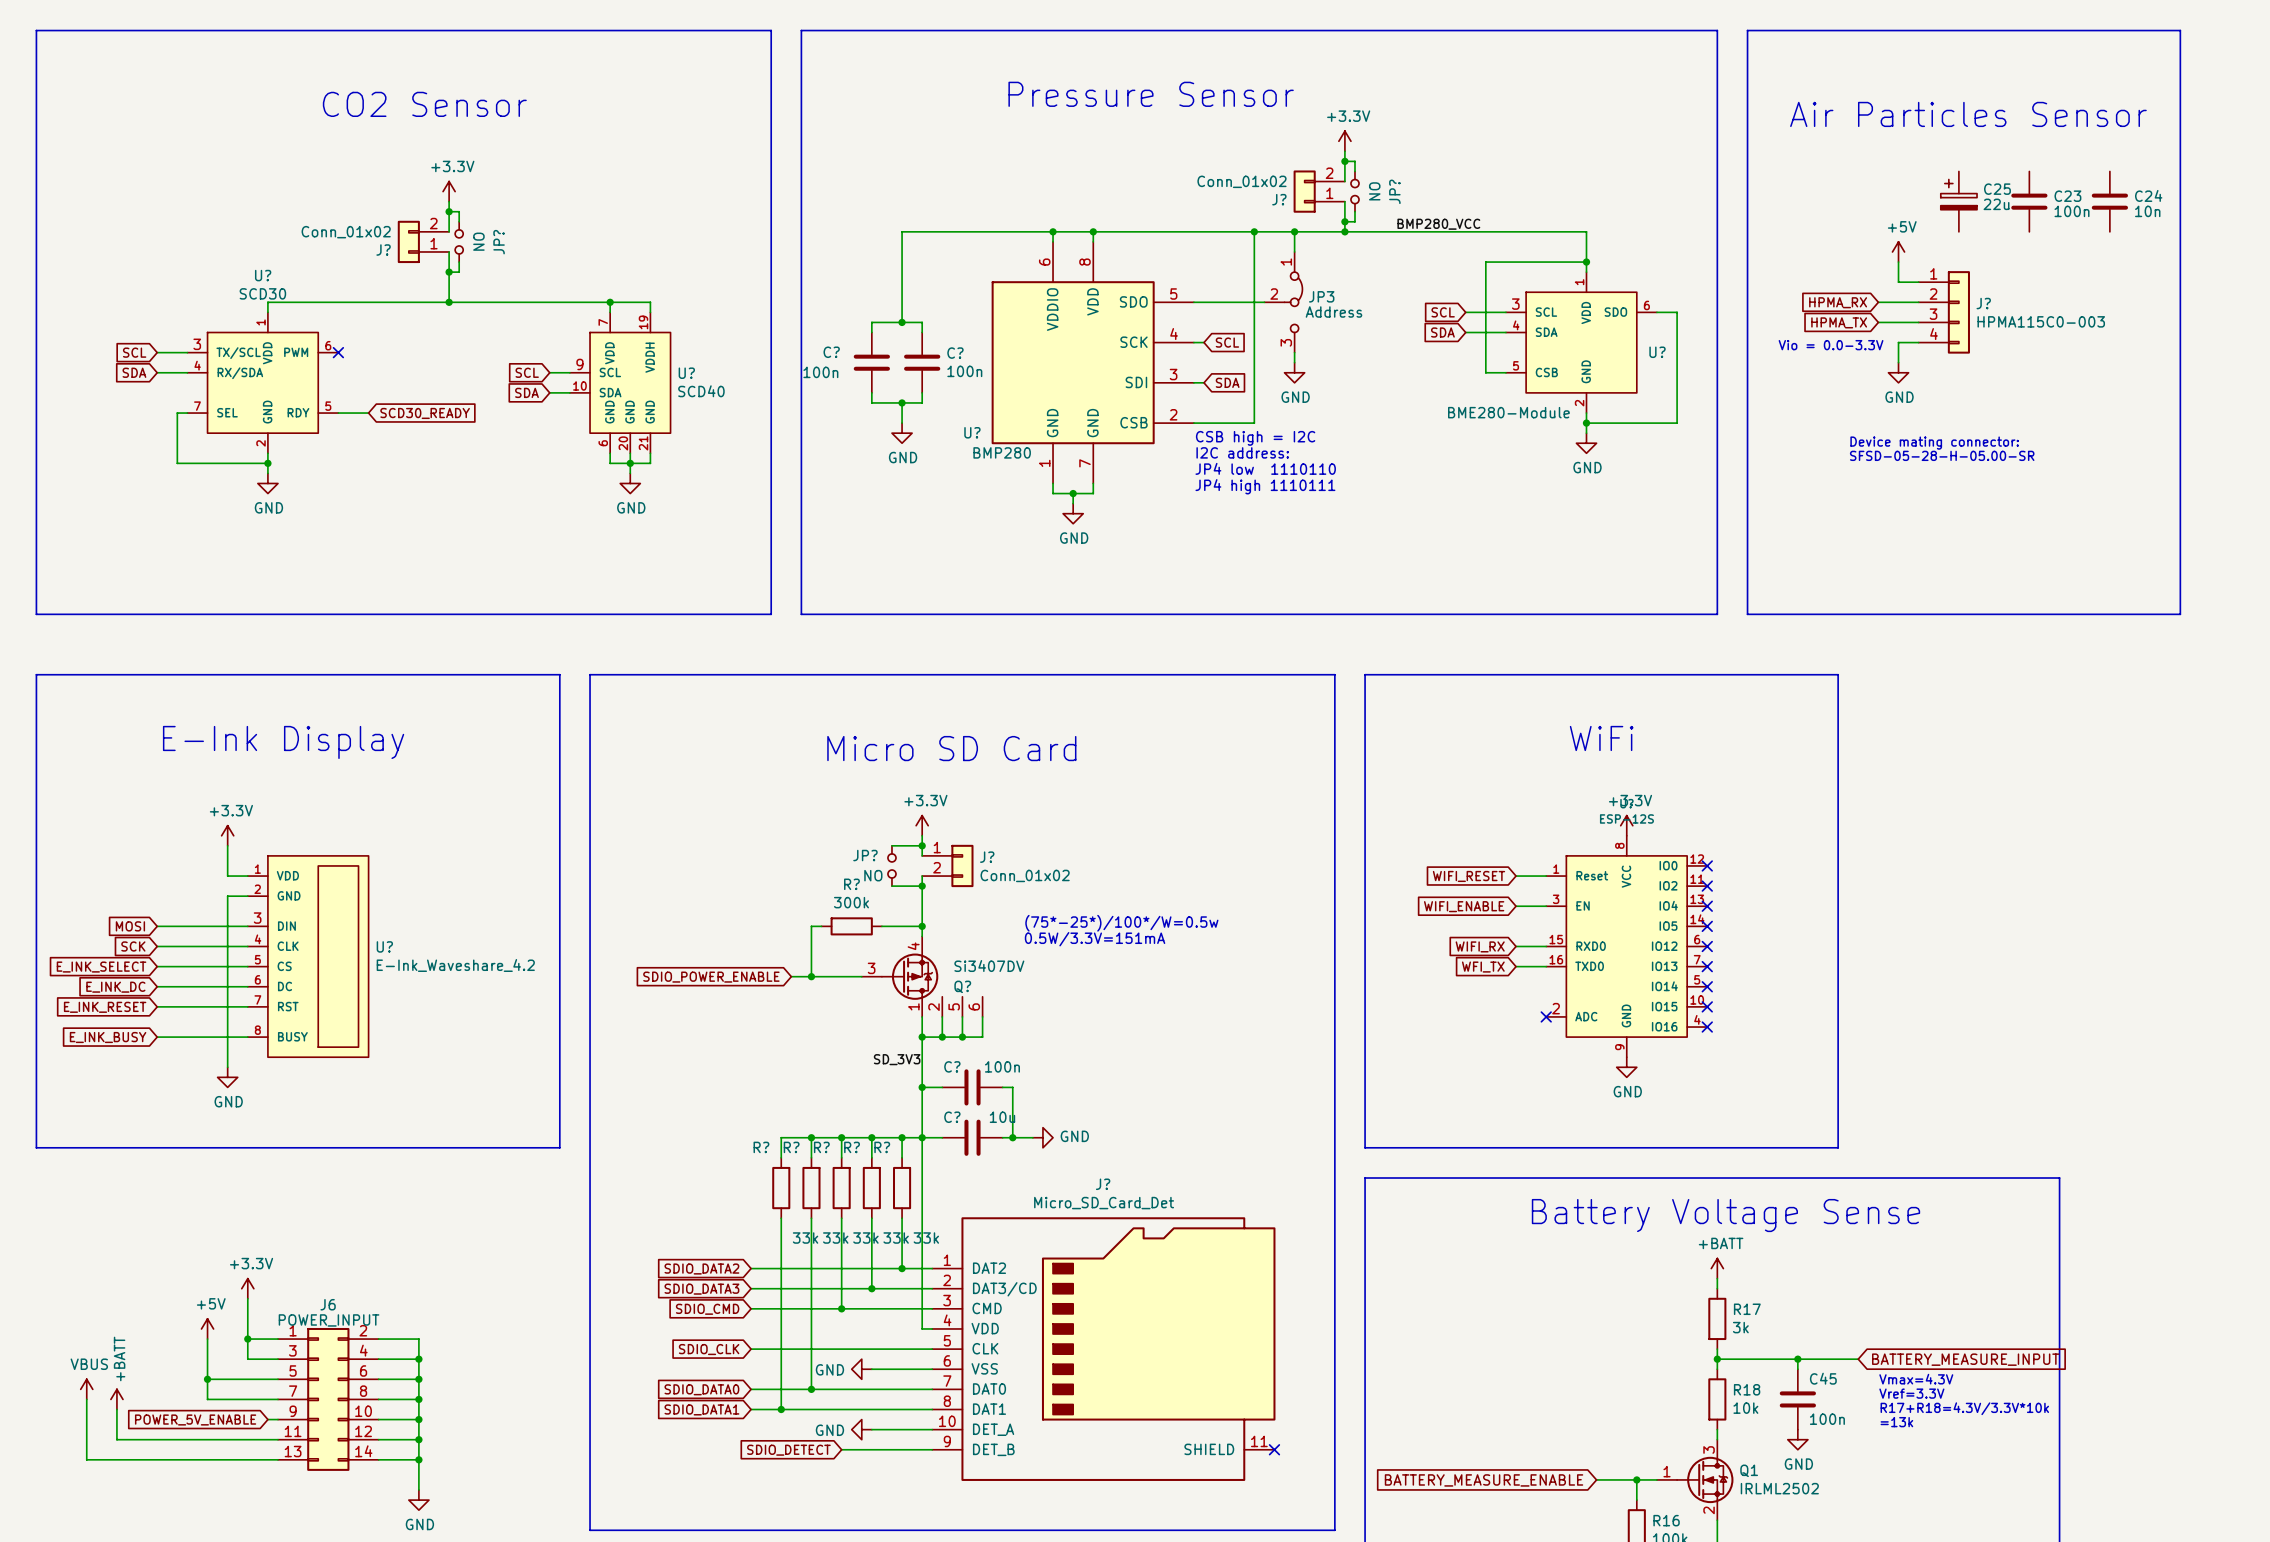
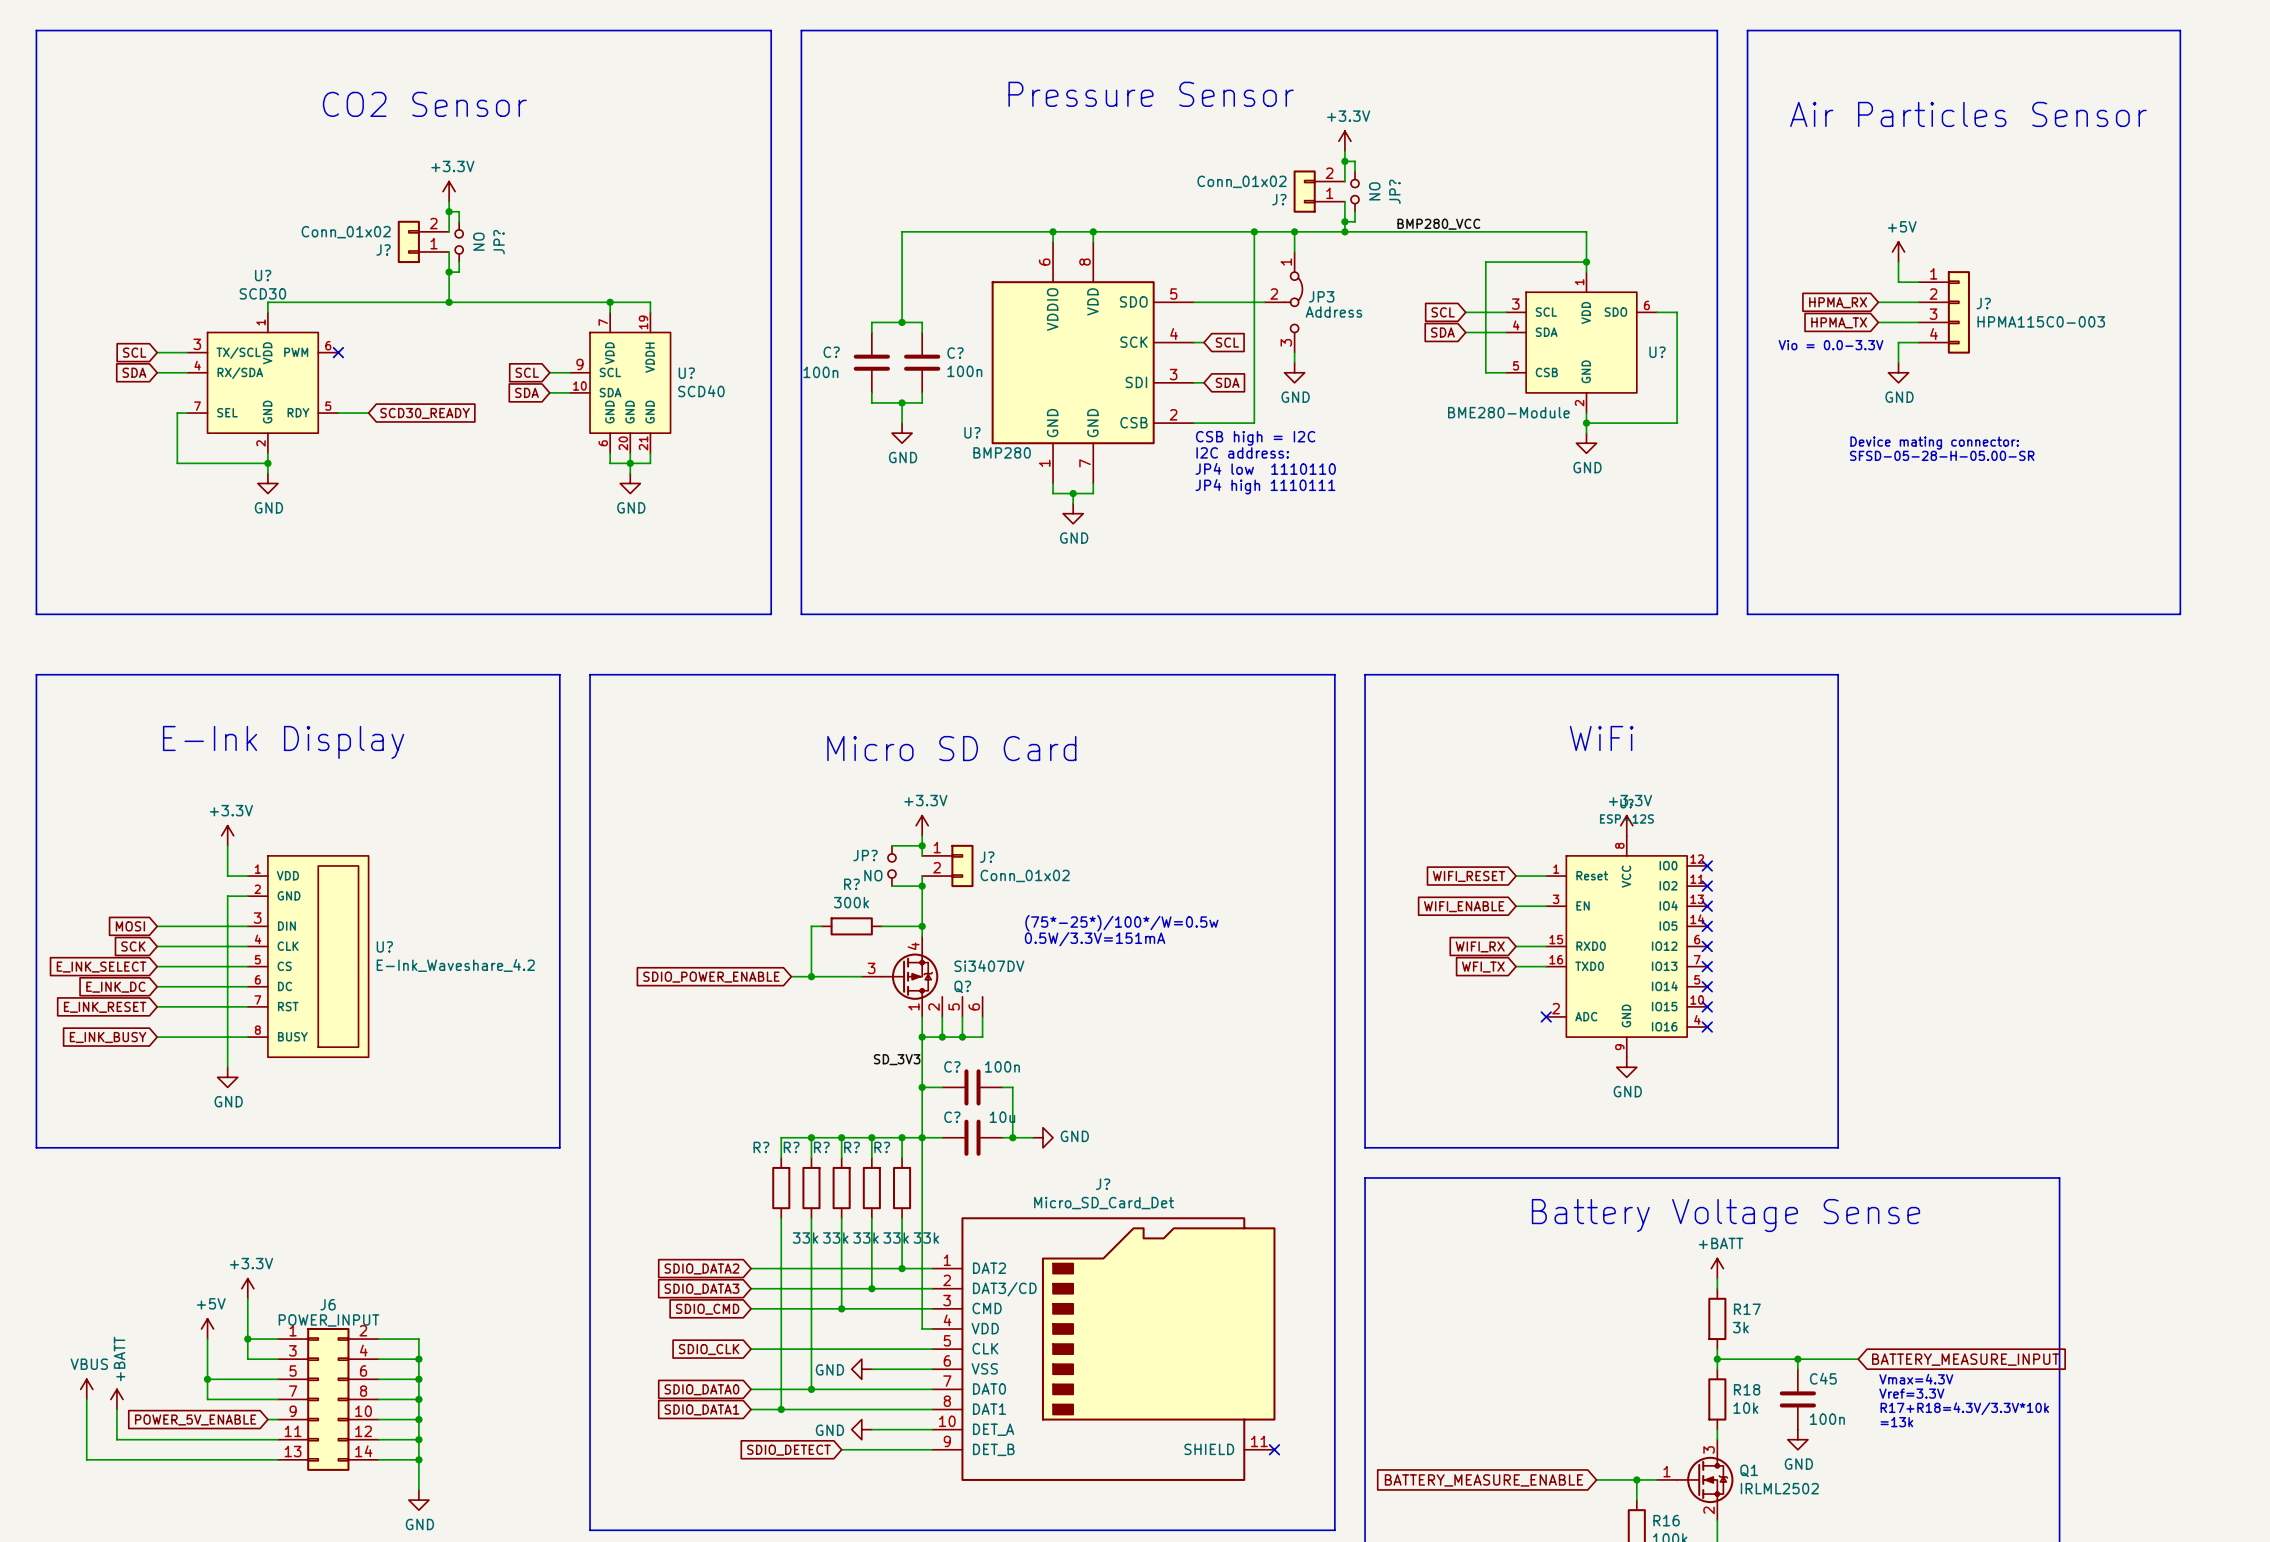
C25: 22u (1958, 201) -> none
C23: 100n (2029, 201) -> none
C24: 10n (2109, 201) -> none

